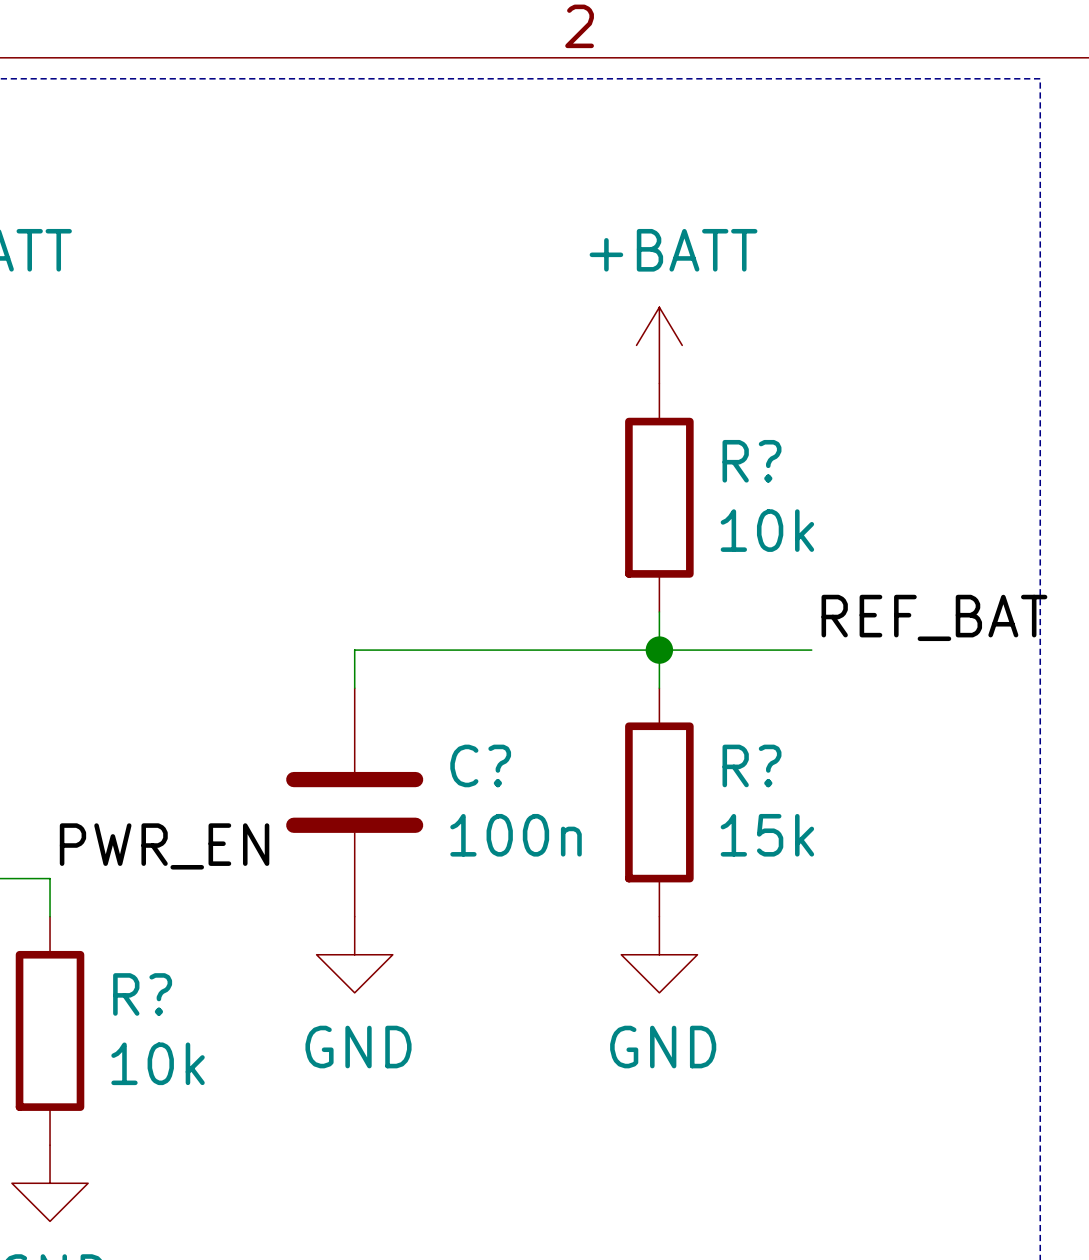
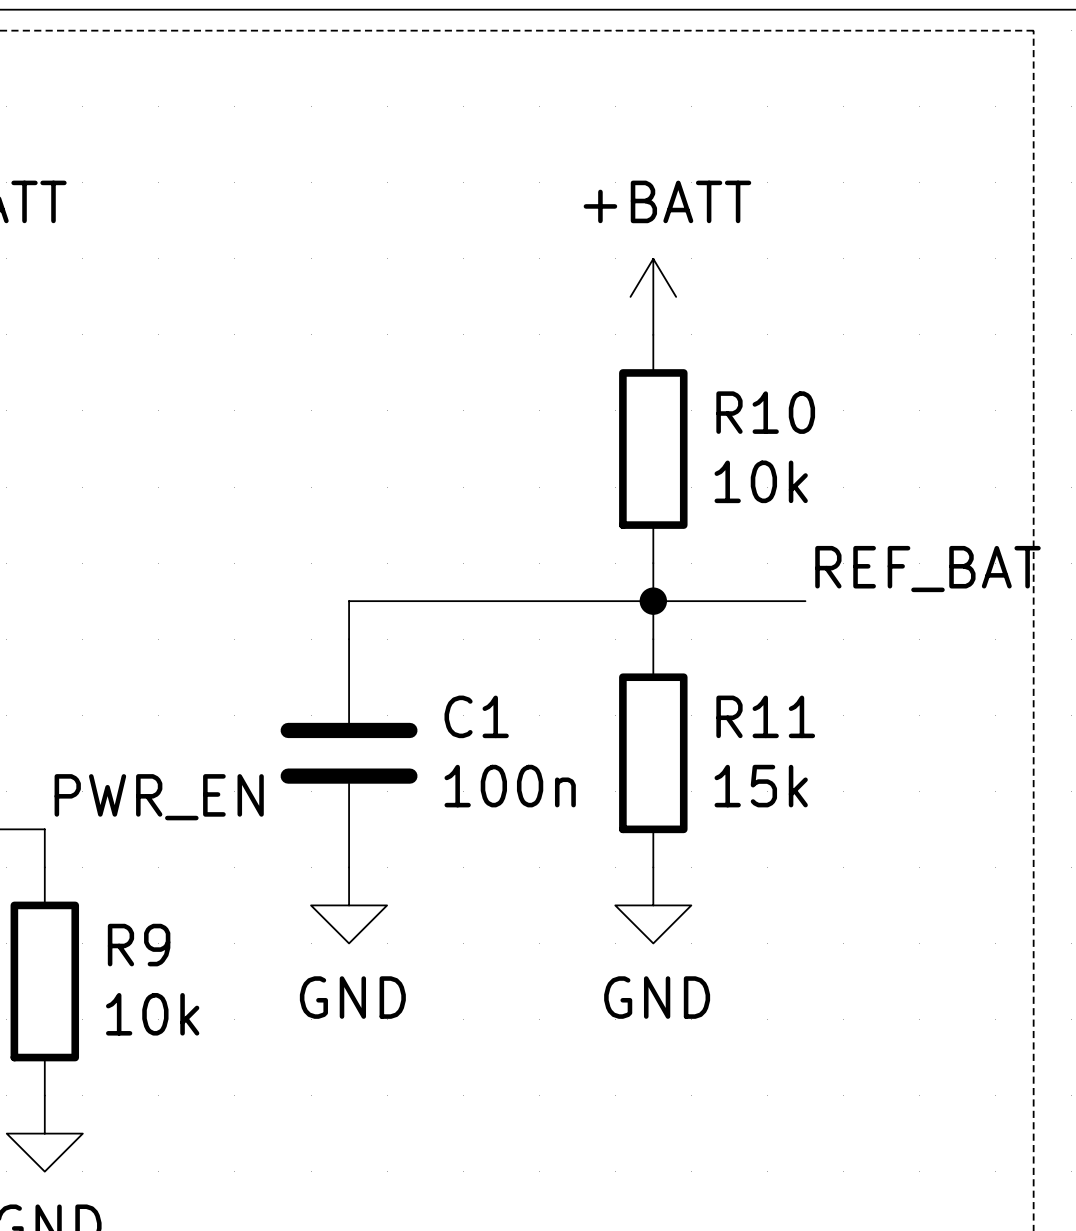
R? name: R? (751, 461) -> R10 (765, 412)
C? name: C? (480, 765) -> C1 (476, 716)
R? name: R? (751, 765) -> R11 (765, 716)
R? name: R? (142, 994) -> R9 (139, 945)

